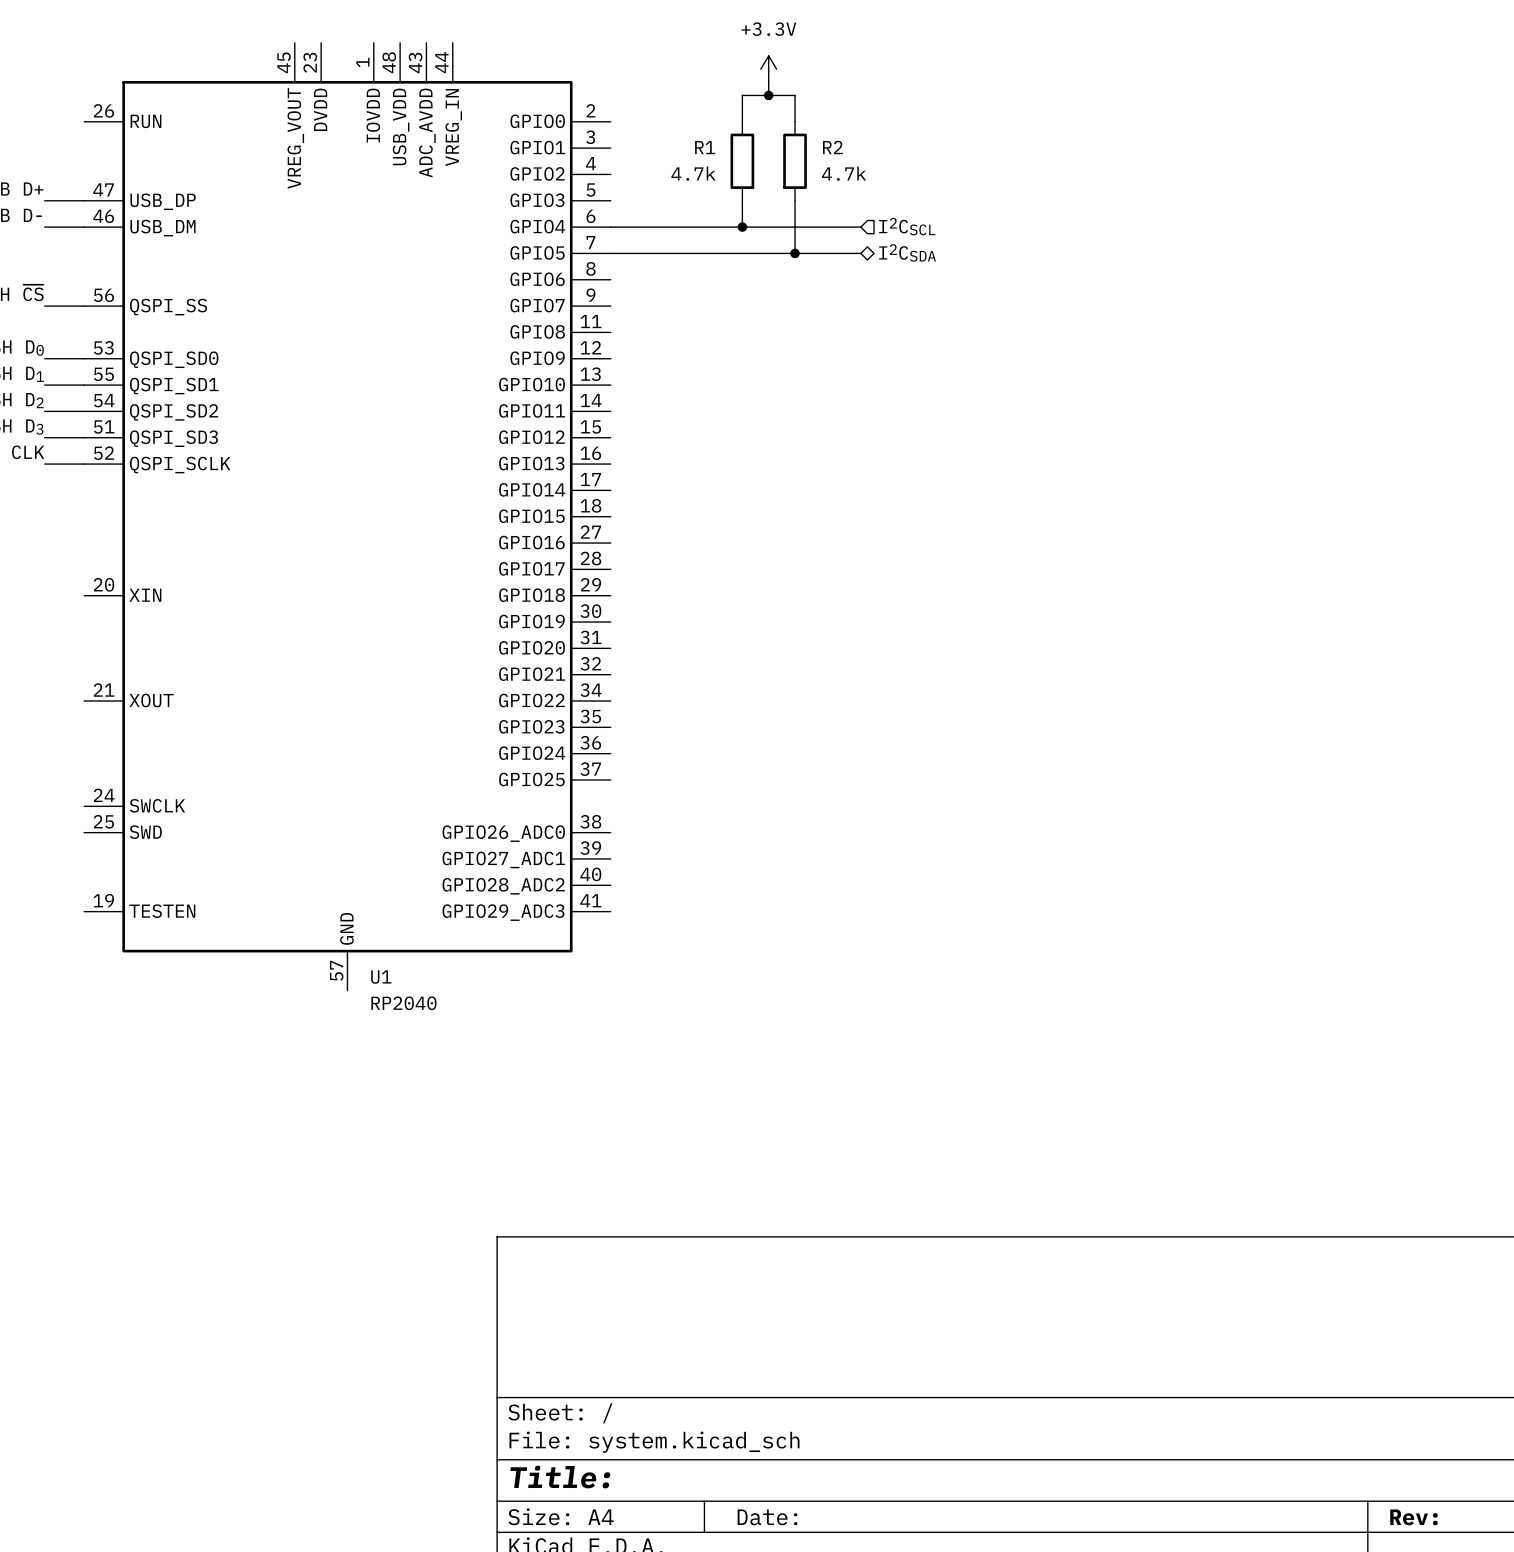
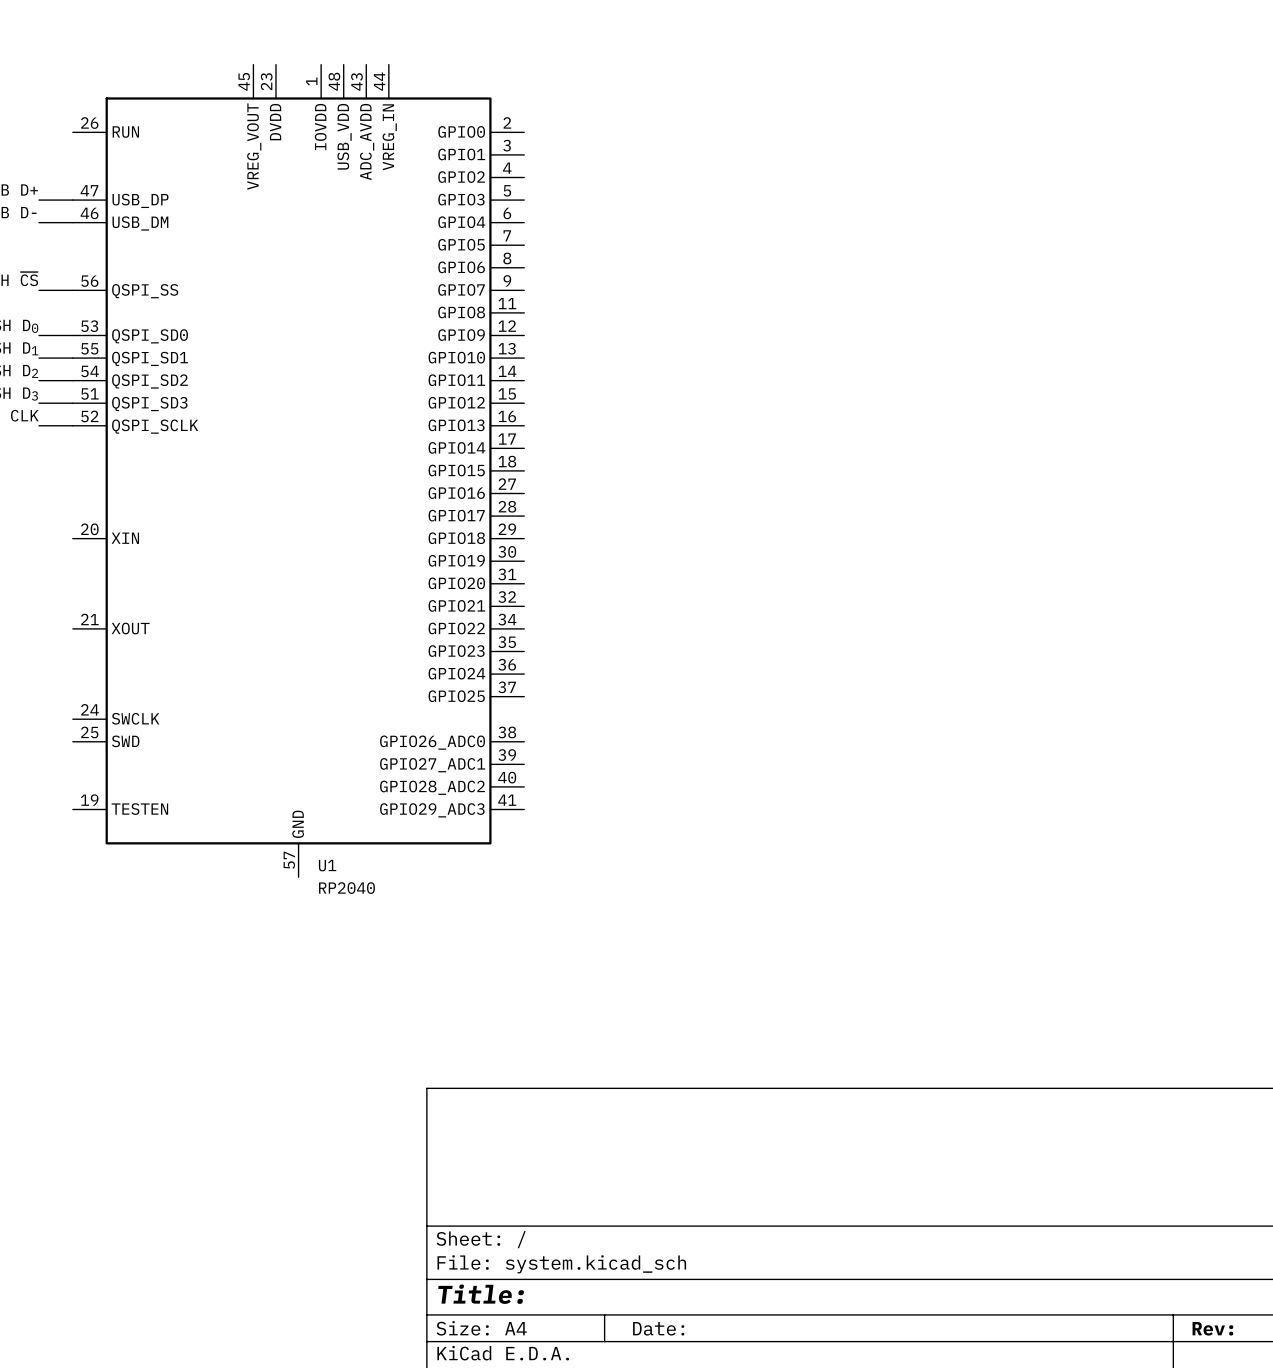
power symbol: +3.3V (768, 69) -> none
wire: (768, 82) (768, 95) -> none
junction: (768, 95) -> none
wire: (742, 121) (742, 95) (795, 95) (795, 121) -> none
R1: 4.7k (742, 161) -> none
R2: 4.7k (795, 161) -> none
wire: (742, 200) (742, 227) -> none
wire: (795, 200) (795, 253) -> none
hierarchical label: I2CSCL (907, 226) -> none
wire: (610, 227) (860, 227) -> none
junction: (742, 227) -> none
hierarchical label: I2CSDA (907, 252) -> none
wire: (610, 253) (860, 253) -> none
junction: (795, 253) -> none

